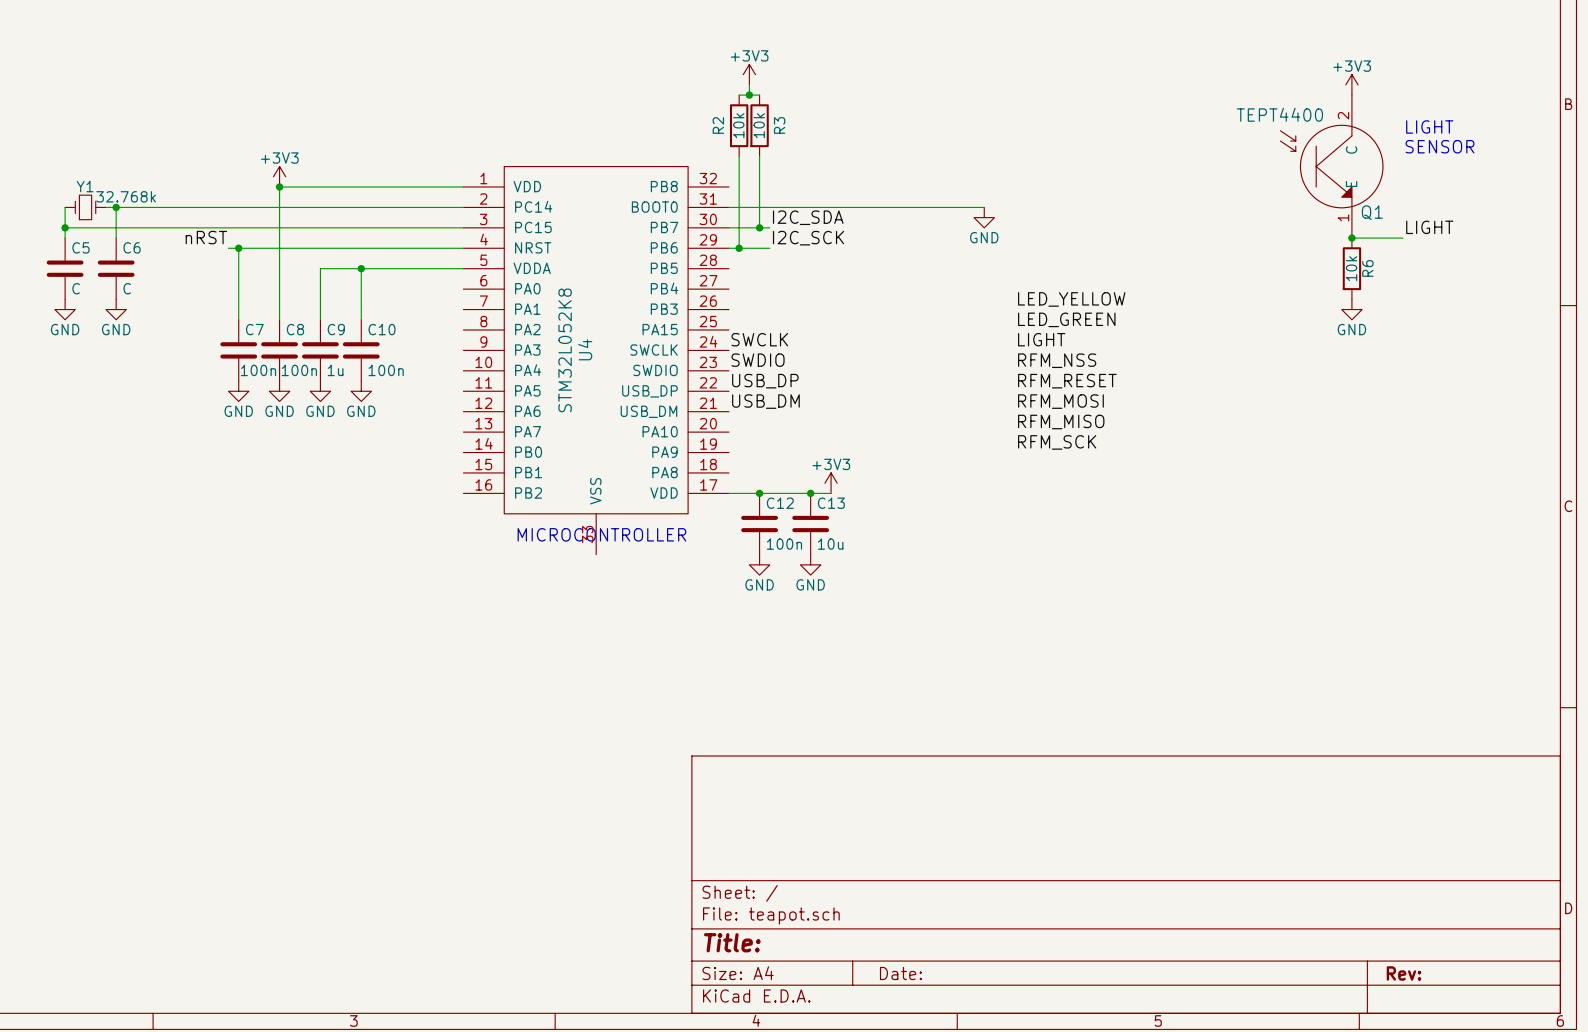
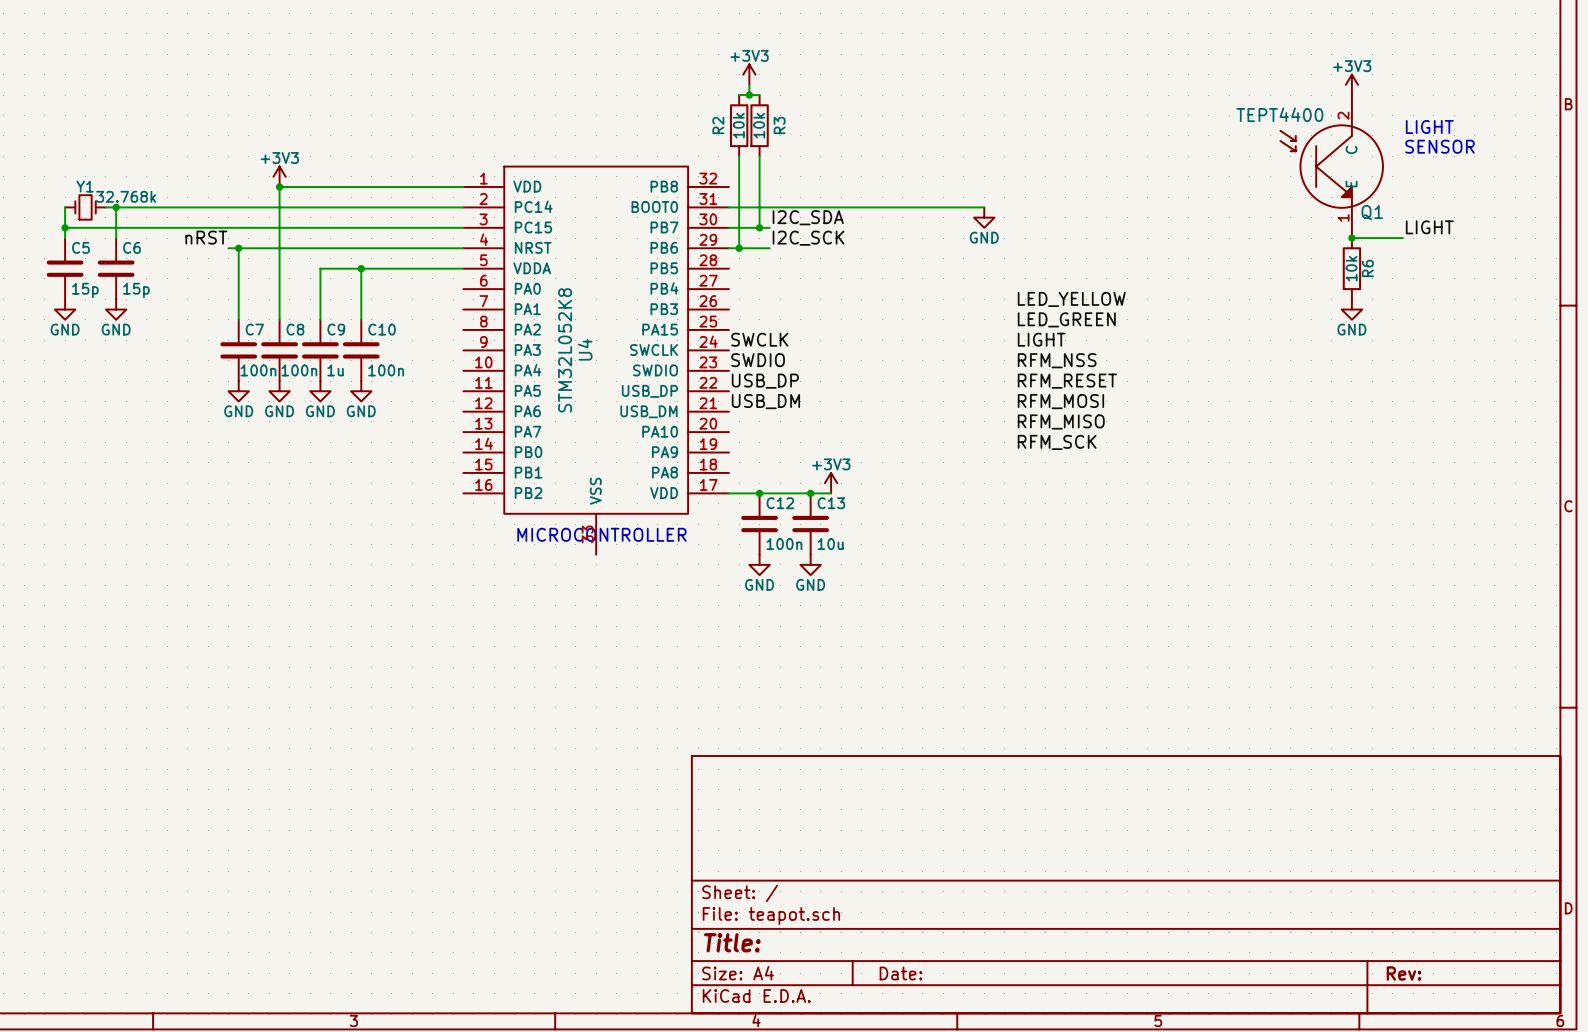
C5 value: C (76, 288) -> 15p (85, 290)
C6 value: C (127, 288) -> 15p (136, 290)

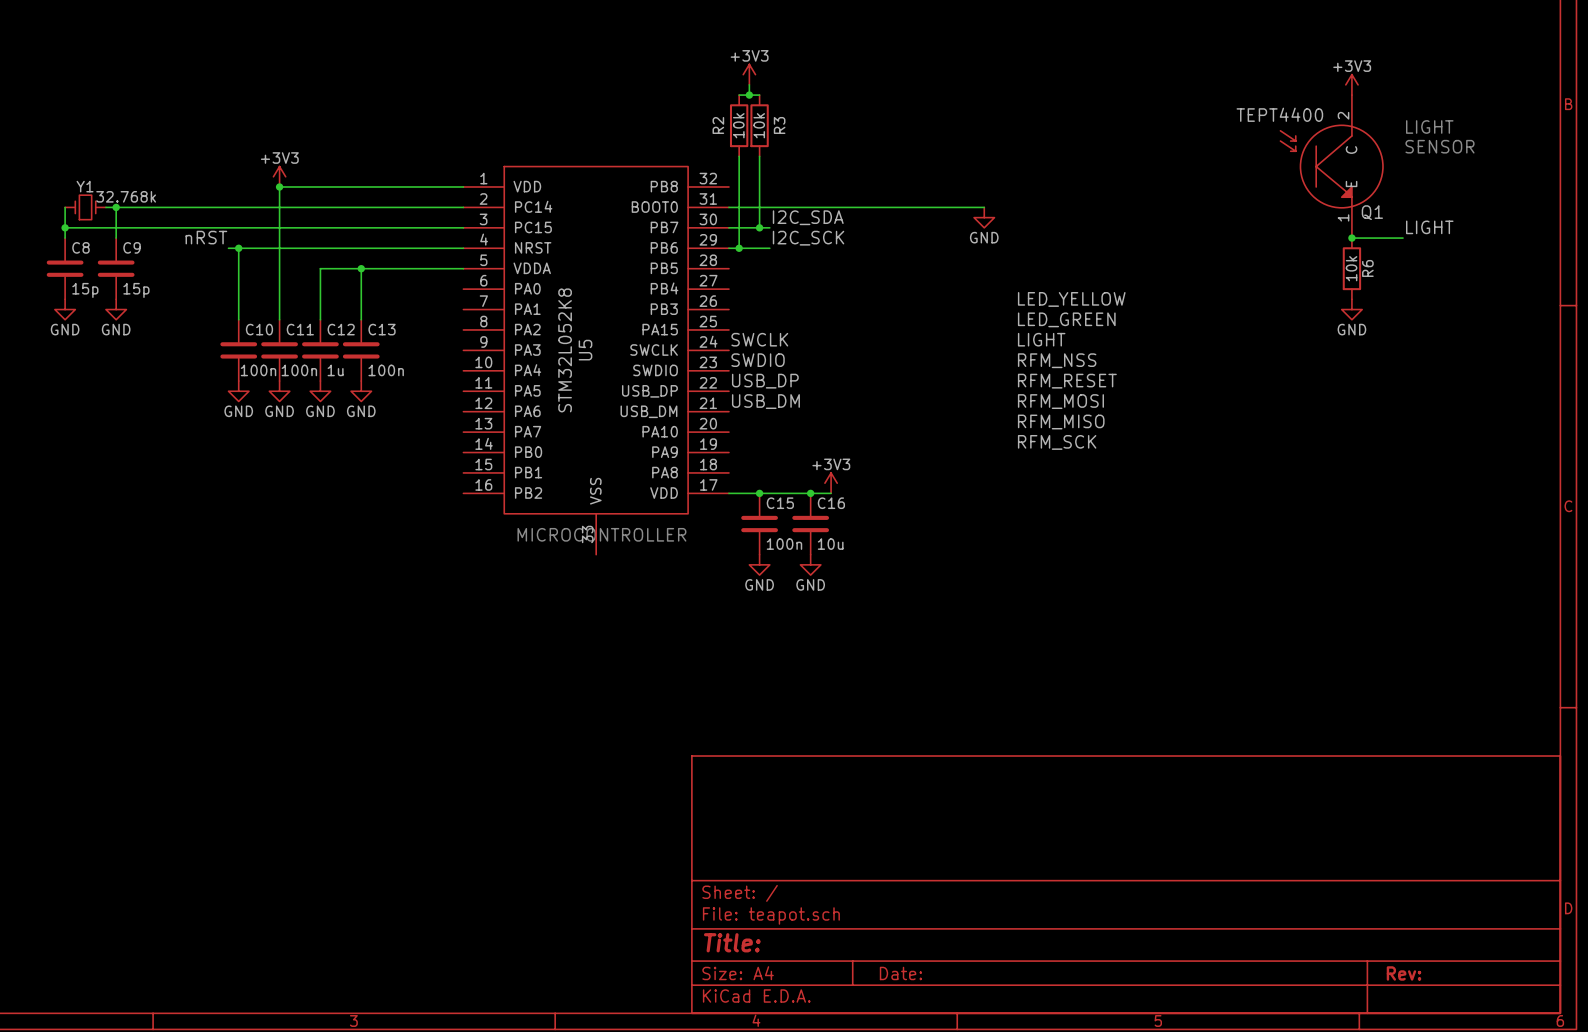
C5 name: C5 (80, 247) -> C8 (80, 247)
C6 name: C6 (132, 247) -> C9 (132, 247)
C7 name: C7 (254, 329) -> C10 (259, 329)
C8 name: C8 (295, 329) -> C11 (300, 329)
C9 name: C9 (336, 329) -> C12 (341, 329)
C10 name: C10 (382, 329) -> C13 (382, 329)
U4 name: U4 (585, 349) -> U5 (585, 350)
C12 name: C12 (780, 503) -> C15 (780, 503)
C13 name: C13 (831, 503) -> C16 (831, 503)

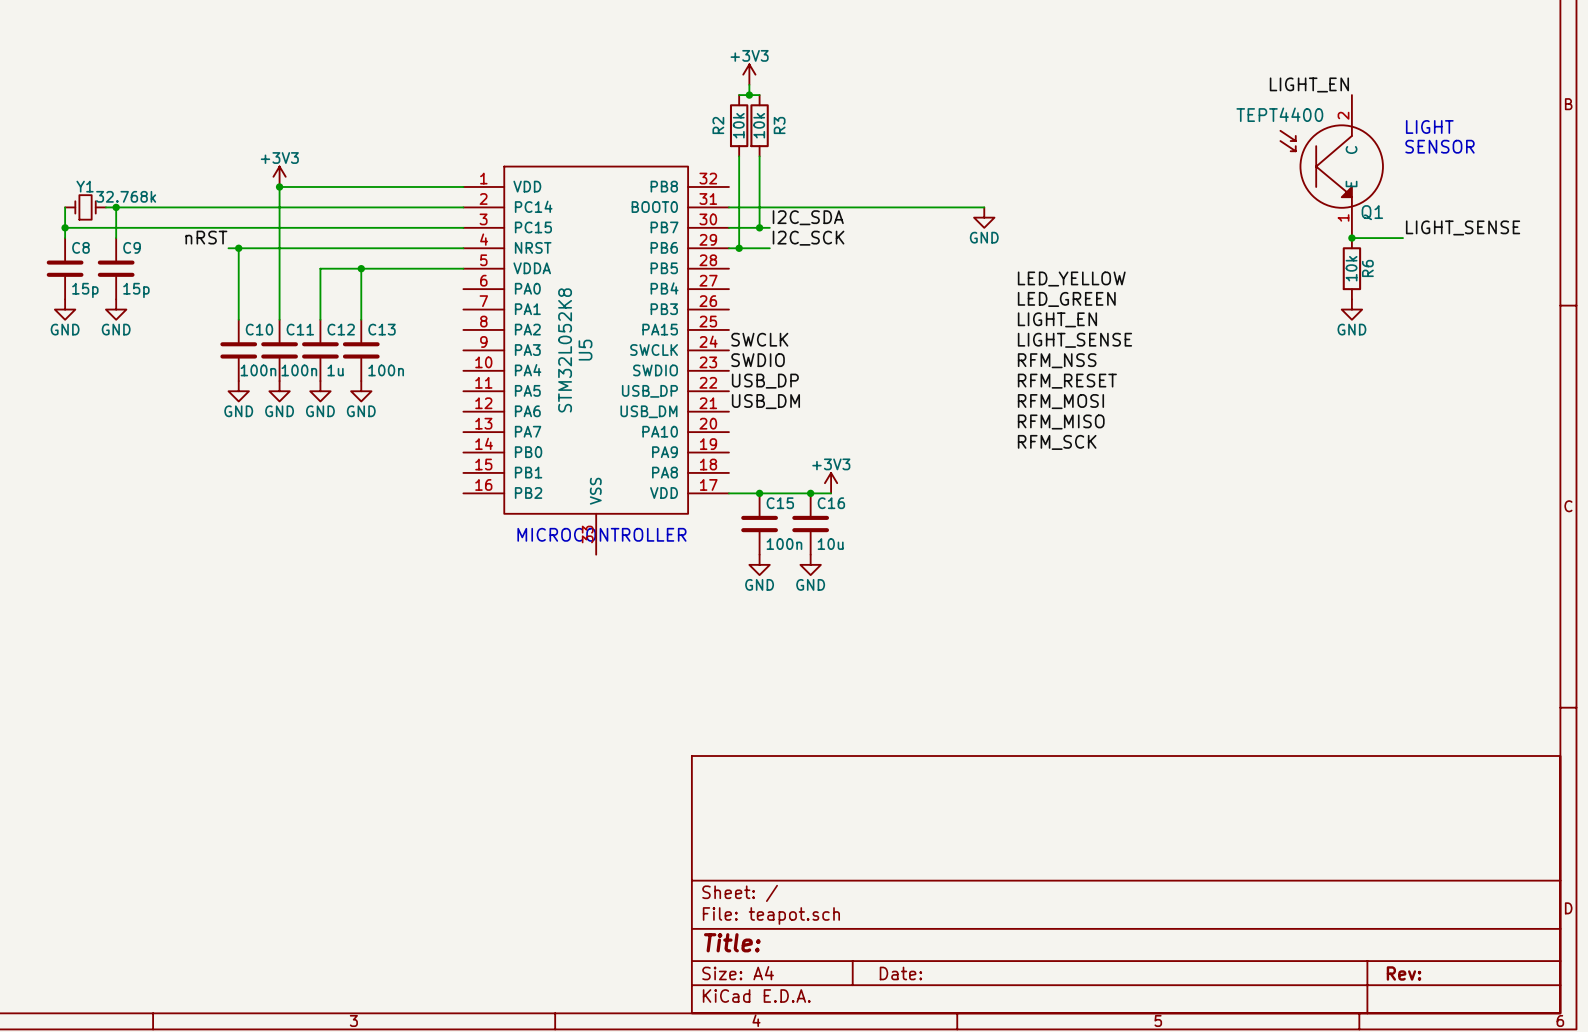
label: none -> LIGHT_EN (1309, 84)
power symbol: +3V3 (1351, 84) -> none
label: LIGHT (1429, 227) -> LIGHT_SENSE (1463, 227)
label: none -> LED_YELLOW (1071, 279)
label: LED_YELLOW (1071, 299) -> LED_GREEN (1066, 299)
label: LED_GREEN (1066, 319) -> LIGHT_EN (1057, 319)
label: LIGHT (1041, 339) -> LIGHT_SENSE (1074, 340)

